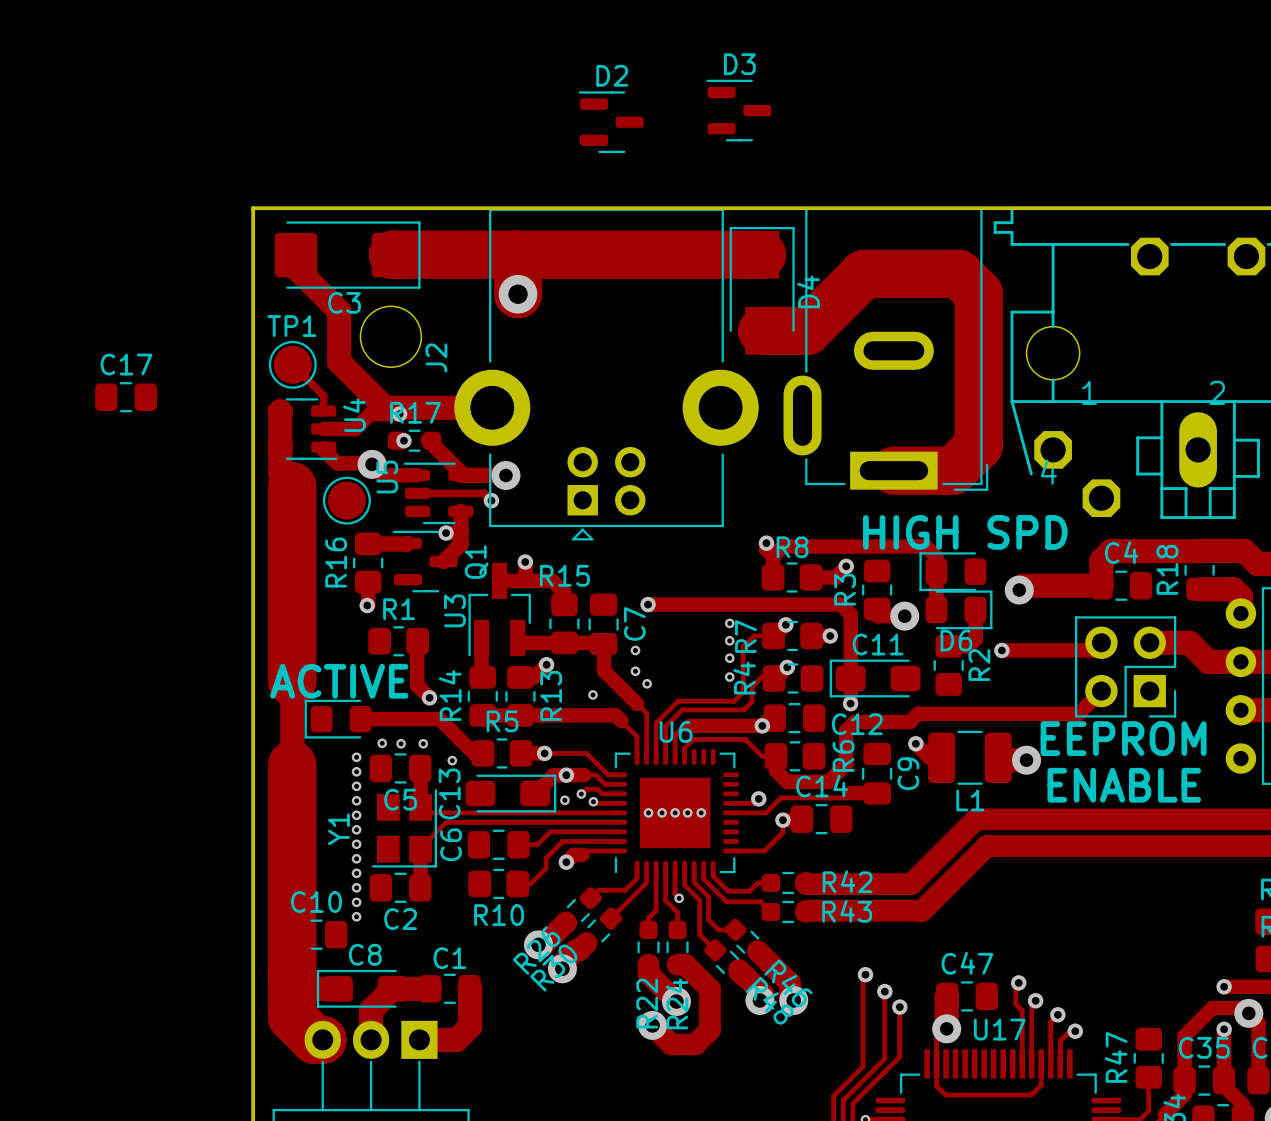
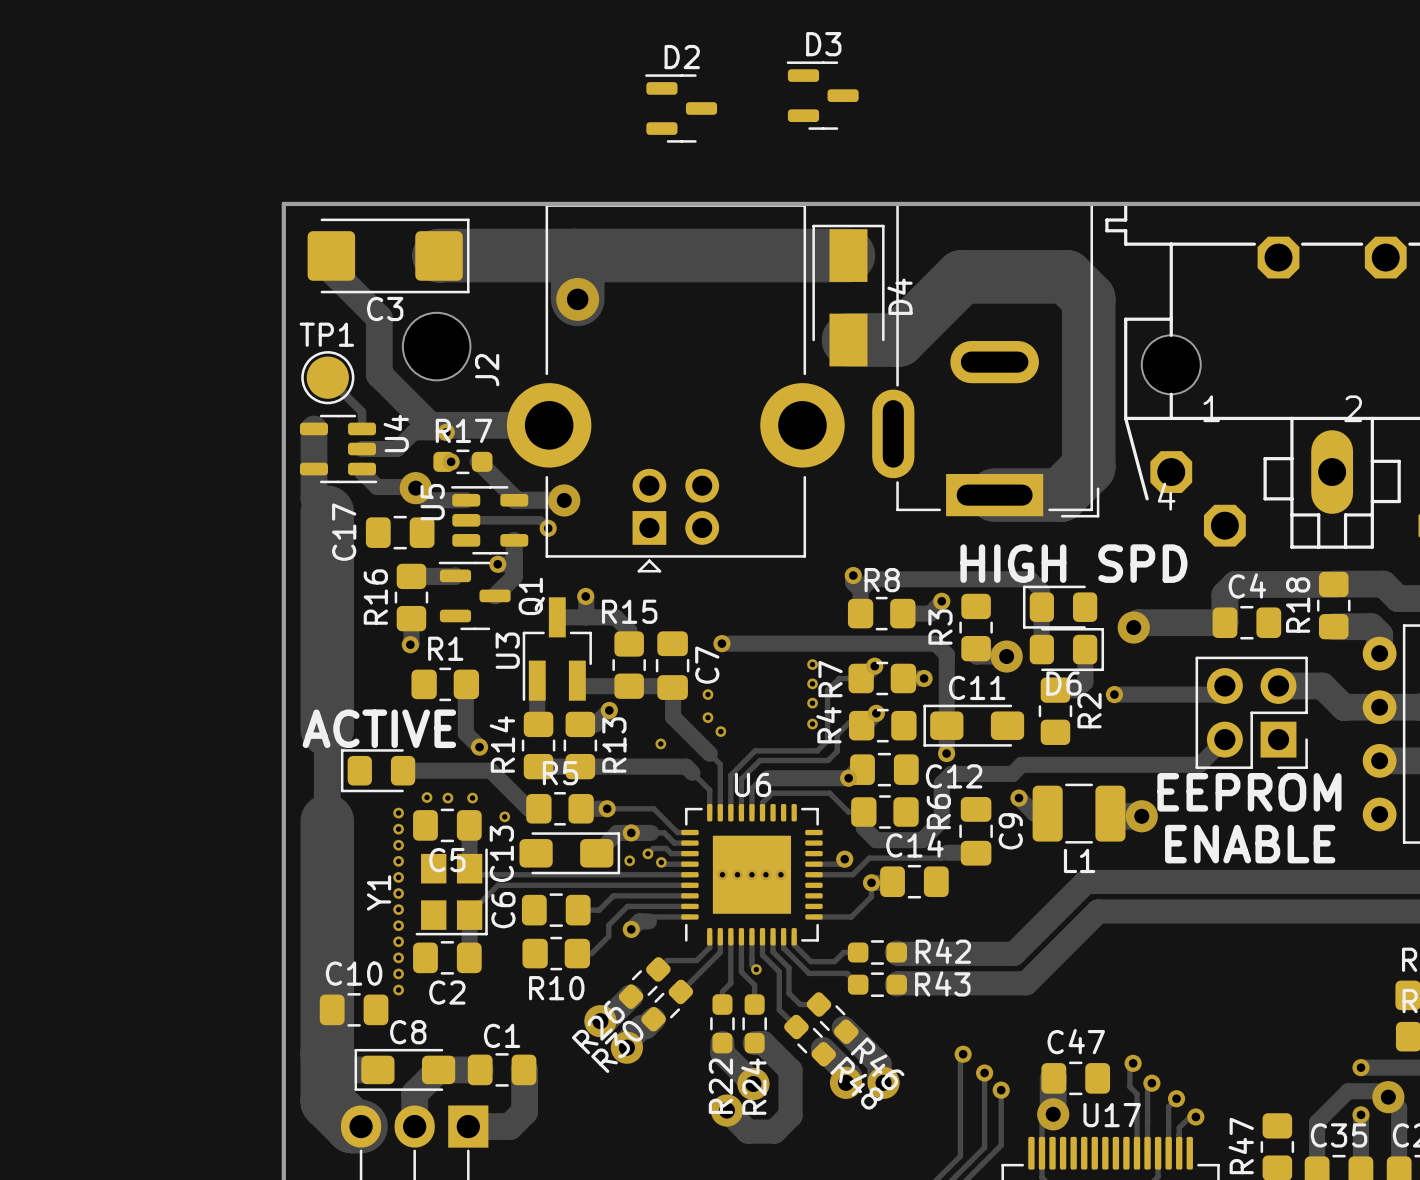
C17 name rotation: 0° (126, 364) -> 90° counterclockwise (344, 532)
C17 position: (126, 397) -> (400, 532)
part: (346, 500) -> none

